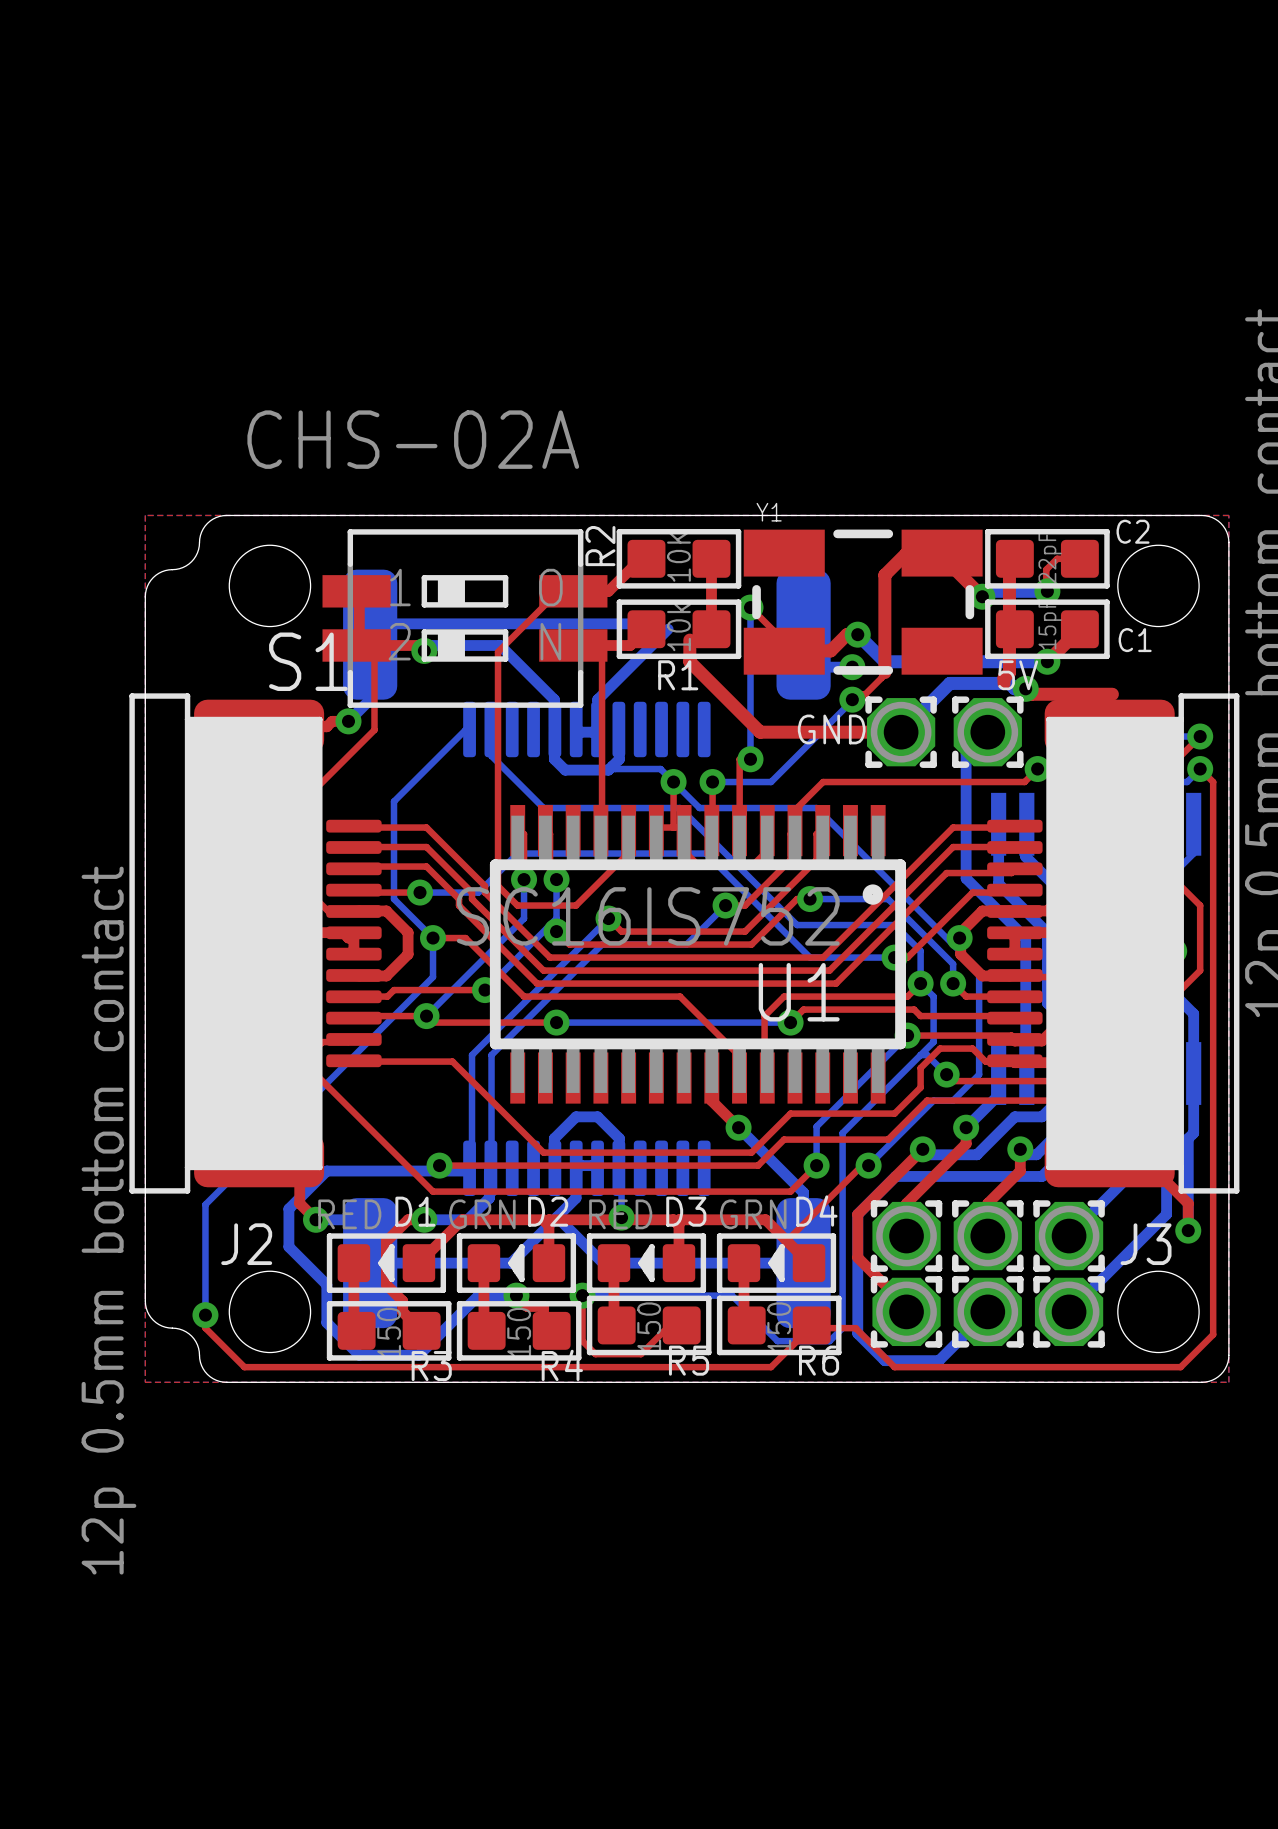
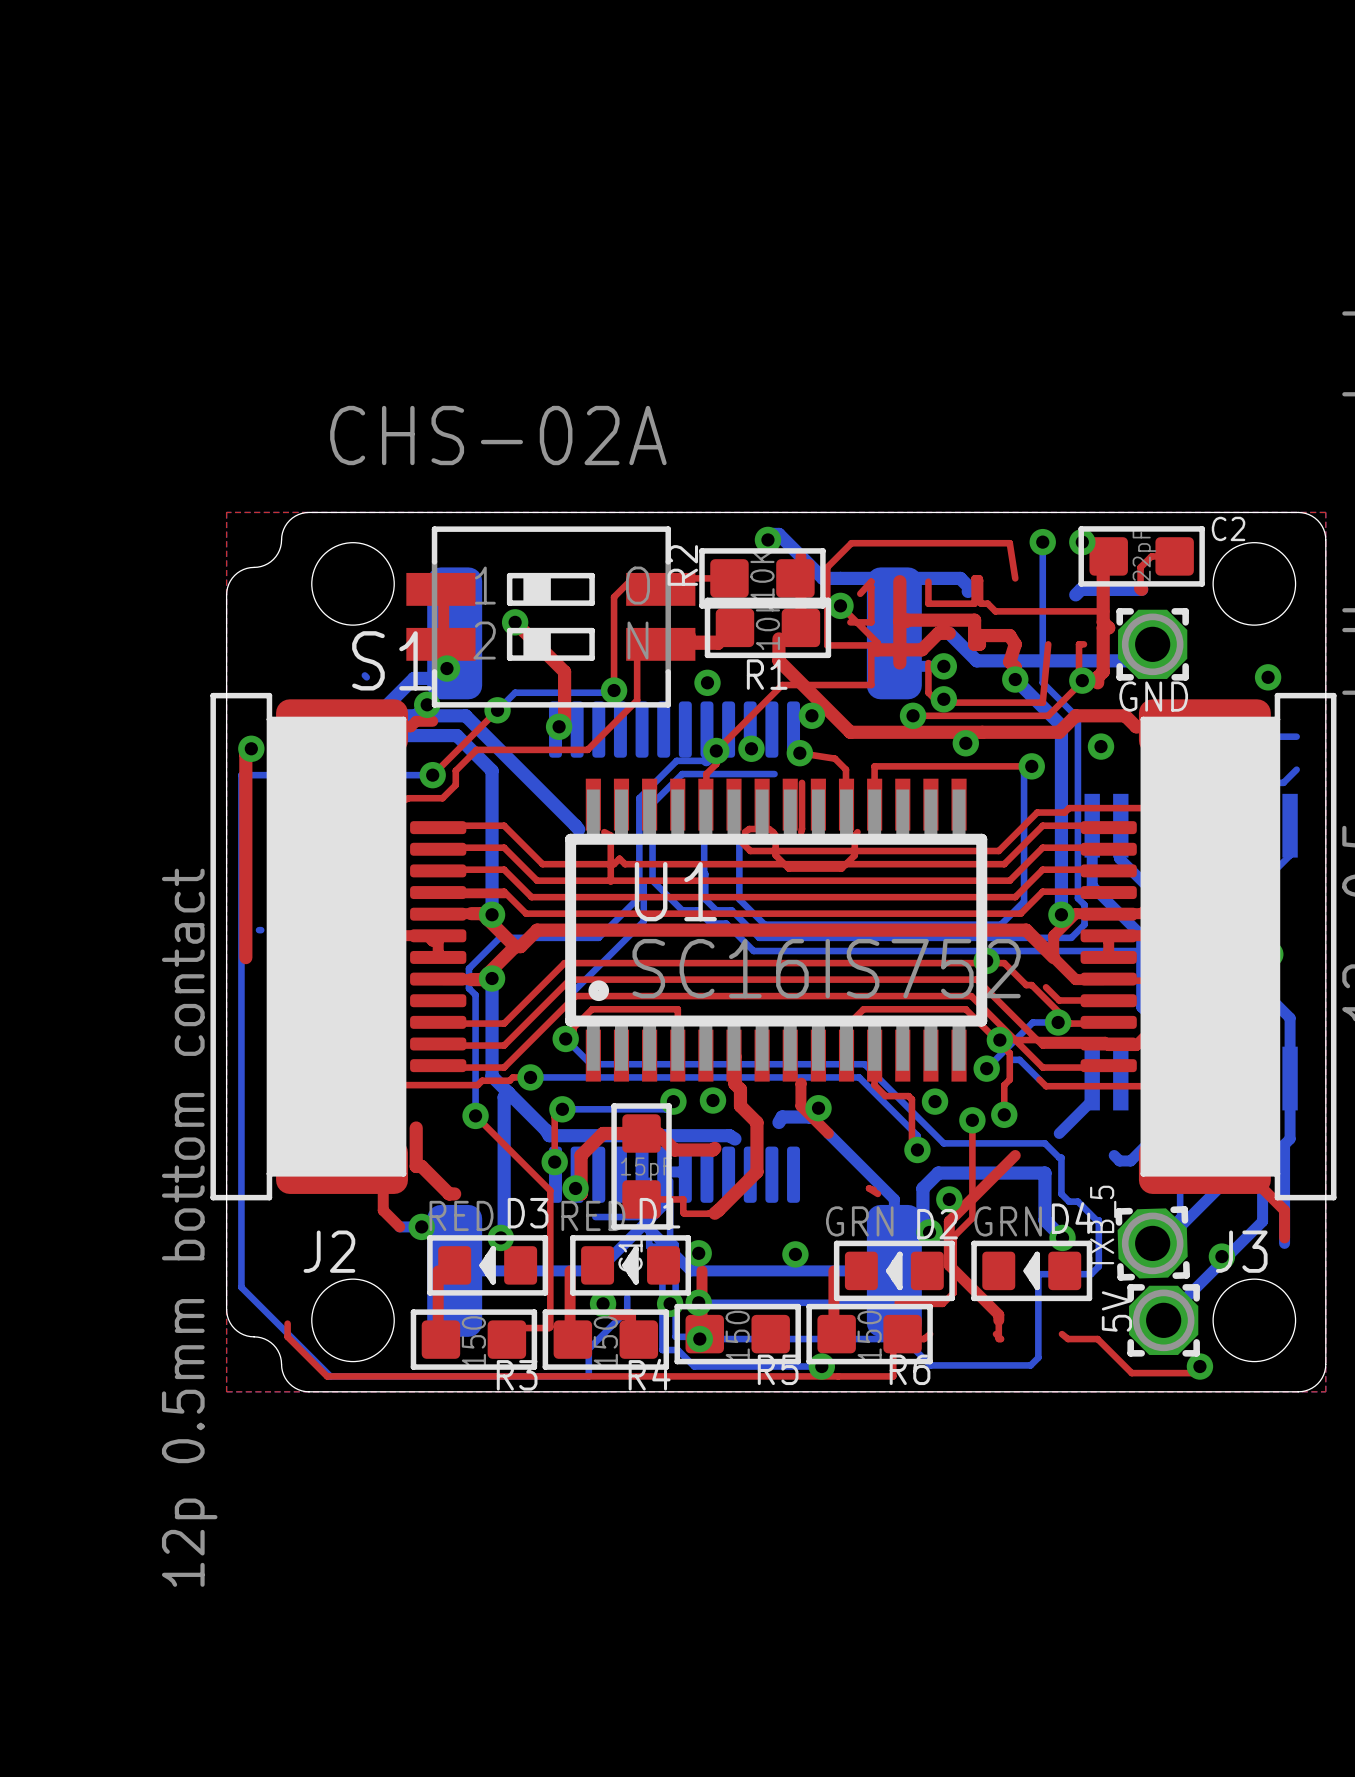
bottom track: none -> (767, 539) (773, 534) (778, 534) (822, 578) (960, 578) (971, 589) (968, 591)
via: none -> (767, 539)
bottom track: none -> (1042, 542) (1042, 682) (1077, 718) (1077, 898) (1084, 904) (1084, 924) (1071, 937) (759, 937) (731, 910) (716, 910) (705, 899) (704, 842)
via: none -> (1042, 542)
via: none -> (1082, 542)
top track: (646, 558) (641, 558) (608, 591) (556, 593) (498, 652) (498, 886) (517, 905) (576, 905) (628, 853) (628, 830) -> none
R2 position: (678, 558) -> (762, 578)
top track: none -> (729, 578) (632, 578) (614, 597) (614, 690)
top track: none -> (1015, 578) (1009, 543) (851, 543) (827, 567) (827, 645) (871, 645) (871, 685) (782, 685) (716, 750) (716, 764) (706, 774) (705, 804)
top track: none -> (899, 581) (899, 663)
top track: none -> (928, 581) (928, 603) (974, 603) (974, 578) (979, 578) (980, 602) (987, 603) (995, 611) (1106, 611)
via: (1047, 591) -> none
top track: none -> (860, 593) (871, 581) (871, 622) (850, 622)
top track: (982, 596) (944, 558) (942, 553) (906, 553) (884, 575) (884, 672) (865, 694) (861, 694) (852, 699) (857, 699) -> none
via: (982, 596) -> none
Y1: (863, 602) -> none
bottom track: (750, 607) (750, 759) -> none
top track: none -> (899, 621) (974, 620) (974, 630) (979, 644) (974, 644) (974, 635) (1009, 635) (1015, 644) (1009, 661) (1015, 667) (1015, 679)
top track: none -> (515, 622) (564, 671) (564, 726) (559, 726)
bottom track: (668, 629) (597, 699) (597, 729) (592, 732) (581, 732) (576, 729) -> none
C1 rotation: 0° (1047, 629) -> 90° clockwise (641, 1166)
C1 position: (1047, 629) -> (641, 1166)
via: (857, 634) -> none
top track: none -> (729, 638) (692, 638) (691, 633) (637, 633) (637, 700) (587, 749) (476, 749) (455, 770) (455, 785) (442, 798) (408, 798) (352, 826) (352, 1067) (397, 1085) (477, 1085) (482, 1080) (509, 1080) (512, 1077) (530, 1077)
bottom track: (654, 642) (635, 623) (375, 623) (370, 629) (370, 699) (348, 721) -> none
top track: (602, 645) (600, 830) -> none
top track: none -> (1048, 644) (1042, 702) (938, 702) (928, 692) (928, 663)
top track: none -> (1083, 644) (1079, 644) (1079, 677) (1082, 680) (1081, 682) (1048, 715) (913, 715)
top track: (424, 650) (418, 645) (356, 645) (374, 645) (374, 730) (315, 788) (315, 899) (328, 912) (353, 911) -> none
bottom track: (424, 650) (429, 645) (500, 645) (554, 699) (554, 759) (565, 770) (608, 770) (618, 760) -> none
via position: (424, 650) -> (515, 622)
via: (1047, 661) -> none
bottom track: none -> (446, 668) (437, 678) (414, 678) (385, 707) (385, 735) (456, 735) (492, 770) (492, 914)
via: none -> (446, 668)
bottom track: none -> (364, 675) (366, 677)
via: none -> (1268, 677)
bottom track: none -> (1015, 679) (1061, 725) (1061, 914)
via: none -> (1015, 679)
via: none -> (1082, 680)
via: none -> (707, 682)
top track: (1025, 688) (1031, 694) (1112, 694) -> none
bottom track: (1025, 688) (1014, 688) (1009, 683) (949, 683) (901, 732) -> none
via: (1025, 688) -> none
bottom track: none -> (614, 690) (614, 692) (515, 692) (497, 710)
via: none -> (614, 690)
bottom track: (857, 699) (852, 699) (771, 782) (712, 782) -> none
top track: none -> (497, 710) (432, 775)
via: none -> (497, 710)
bottom track: none -> (405, 715) (465, 715) (578, 829)
via: none -> (811, 715)
via: none -> (913, 715)
via position: (348, 721) -> (427, 704)
via: none -> (559, 726)
top track: none -> (1204, 726) (1136, 726) (1125, 715) (1075, 715) (1059, 732) (993, 732)
bottom track: (469, 729) (465, 730) (394, 801) (394, 899) (433, 938) (433, 977) (205, 1204) (205, 1315) -> none
GND name position: GND (831, 729) -> GND (1153, 696)
bottom track: (491, 730) (491, 756) (543, 808) (680, 808) (797, 925) (894, 925) (920, 951) (920, 983) (933, 996) (933, 1042) (842, 1133) (842, 1328) (829, 1341) (777, 1341) (732, 1295) (582, 1295) -> none
GND position: (901, 732) -> (1152, 644)
bottom track: (987, 732) (966, 753) (966, 878) (1025, 938) (1026, 1073) -> none
5V: (987, 732) -> none
top track: (1200, 736) (1174, 762) (1174, 879) (1200, 905) (1200, 970) (1070, 1100) (927, 1100) (888, 1139) (784, 1139) (758, 1165) (439, 1165) -> none
via: (1200, 736) -> none
via: none -> (965, 743)
via: none -> (1101, 746)
top track: none -> (251, 748) (245, 754) (245, 957)
via: none -> (251, 748)
via: none -> (751, 748)
bottom track: none -> (716, 750) (706, 760) (676, 760) (639, 798) (639, 897) (598, 937) (499, 937) (468, 968) (468, 988) (475, 995) (475, 1115)
via: none -> (716, 750)
top track: none -> (799, 753) (835, 758) (845, 769) (846, 804)
via: none -> (799, 753)
top track: (750, 759) (739, 759) (739, 830) -> none
via: (750, 759) -> none
top track: none -> (1031, 766) (874, 766) (874, 804)
bottom track: none -> (1031, 766) (1024, 774) (1024, 901) (1000, 924) (764, 924) (739, 899) (739, 842)
via: none -> (1031, 766)
bottom track: (612, 766) (615, 769) (660, 769) (699, 808) (816, 808) (979, 970) (979, 1074) (953, 1100) (933, 1100) (868, 1165) -> none
top track: (1037, 769) (1024, 782) (823, 782) (797, 808) (797, 827) (790, 834) (790, 860) (745, 905) (725, 905) -> none
via: (1037, 769) -> none
top track: (1200, 769) (1213, 782) (1213, 1334) (1180, 1367) (894, 1367) (855, 1328) (816, 1328) (811, 1325) (771, 1367) -> (930, 1334) (924, 1339) (893, 1340) (893, 1376) (861, 1376)
via: (1200, 769) -> none
bottom track: none -> (774, 774) (682, 774) (652, 803) (652, 880) (682, 910) (697, 910) (710, 923) (726, 923) (753, 951) (1149, 951) (1180, 981) (1180, 1215) (1152, 1243)
bottom track: none -> (432, 775) (241, 775) (241, 1287) (330, 1376) (588, 1376) (588, 1348) (627, 1310) (627, 1297)
via: none -> (432, 775)
top track: (673, 782) (673, 827) -> none
via: (673, 782) -> none
via: (712, 782) -> none
top track: none -> (733, 804) (733, 834) (750, 851) (998, 851) (1037, 812) (1064, 812) (1069, 808) (1149, 807)
top track: (353, 826) (426, 827) (485, 886) (485, 892) (550, 957) (823, 957) (953, 827) (1014, 826) -> (438, 827) (443, 825) (504, 825) (542, 864) (614, 864) (619, 858) (625, 864) (1004, 864) (1042, 825) (1103, 825) (1108, 827)
top track: (822, 830) (816, 834) (816, 860) (745, 931) (621, 931) (608, 918) -> none
top track: (353, 847) (426, 847) (472, 892) (472, 899) (543, 970) (829, 970) (953, 847) (1014, 847) -> (438, 849) (504, 847) (537, 880) (1009, 880) (1042, 847) (1108, 849)
top track: (353, 868) (354, 866) (426, 866) (459, 899) (459, 905) (537, 983) (836, 983) (946, 873) (1011, 873) (1014, 868) -> (438, 870) (504, 869) (531, 897) (1015, 897) (1042, 869) (1108, 870)
bottom track: (524, 879) (524, 918) (426, 1016) -> none
via: (524, 879) -> none
via: (556, 879) -> none
top track: (1014, 890) (1011, 892) (972, 892) (907, 957) (894, 957) -> (1108, 892) (1042, 891) (1020, 913) (526, 913) (504, 891) (438, 892)
bottom track: (420, 892) (478, 892) (517, 853) (706, 853) (810, 957) (894, 957) -> none
via: (420, 892) -> none
top track: (810, 899) (797, 899) (751, 944) (569, 944) (556, 931) -> none
bottom track: (810, 899) (888, 899) (953, 964) (953, 983) -> none
via: (810, 899) -> none
bottom track: (725, 905) (686, 944) (602, 944) (491, 1055) (491, 1165) (489, 1171) (489, 1198) (467, 1219) (424, 1219) -> none
via: (725, 905) -> none
top track: (386, 910) (408, 932) (408, 954) (386, 975) -> (515, 946) (482, 979) (471, 979)
top track: none -> (471, 913) (482, 913) (515, 946)
via: none -> (492, 914)
bottom track: (608, 918) (472, 1055) (472, 1165) (467, 1171) (326, 1171) (288, 1208) (288, 1246) (326, 1284) (326, 1322) (359, 1355) (418, 1355) (478, 1295) (516, 1295) -> none
via: (608, 918) -> none
bottom track: none -> (259, 930) (261, 930)
via: (556, 931) -> none
top track: (433, 938) (465, 938) (524, 996) (680, 996) (738, 1055) (739, 1078) -> none
via: (433, 938) -> none
via position: (959, 938) -> (1061, 914)
top track: none -> (515, 946) (520, 946) (537, 930) (1026, 930) (1053, 957)
U1 rotation: 0° (697, 954) -> 180° (776, 930)
bottom track: none -> (492, 978) (492, 1076) (549, 1135) (729, 1135) (734, 1138)
via: none -> (492, 978)
top track: (920, 983) (907, 996) (784, 996) (764, 1016) (764, 1074) (767, 1078) -> none
via: (920, 983) -> none
via: (953, 983) -> none
top track: (485, 990) (394, 990) (387, 996) (353, 996) -> none
via: (485, 990) -> none
top track: (1096, 1013) (1096, 1030) (1063, 1062) (985, 1061) (972, 1048) (940, 1048) (920, 1068) (920, 1087) (894, 1113) (790, 1113) (751, 1152) (543, 1152) (452, 1061) (353, 1060) -> (1108, 1065) (1103, 1067) (1042, 1067) (971, 996) (575, 996) (504, 1067) (443, 1067) (438, 1065)
via: (426, 1016) -> none
top track: (353, 1018) (354, 1016) (426, 1016) (433, 1022) (556, 1022) -> none
bottom track: none -> (1058, 1022) (1032, 1022) (986, 1068)
via: none -> (1058, 1022)
top track: (1014, 1018) (1011, 1016) (920, 1016) (914, 1009) (803, 1009) (790, 1022) -> (1108, 1022) (1070, 1023) (1031, 985) (1026, 985) (1004, 963) (564, 963) (504, 1023) (438, 1022)
bottom track: (556, 1022) (790, 1022) -> none
via: (556, 1022) -> none
via: (790, 1022) -> none
top track: none -> (565, 1038) (573, 1031) (573, 1027) (592, 1009) (677, 1009) (677, 1055)
bottom track: none -> (565, 1038) (590, 1064) (864, 1064) (943, 1143) (1044, 1143) (1061, 1157) (1061, 1193) (1069, 1201) (1077, 1201) (1098, 1220) (1098, 1266) (1091, 1274) (1038, 1274) (1038, 1357) (1030, 1365) (930, 1365) (904, 1339) (699, 1339) (697, 1336) (675, 1336) (675, 1244) (670, 1239) (670, 1180)
via: none -> (565, 1038)
bottom track: (907, 1035) (816, 1126) (816, 1165) -> none
top track: (353, 1039) (348, 1042) (322, 1042) (315, 1048) (315, 1074) (433, 1191) (790, 1191) (816, 1165) -> (438, 1044) (504, 1045) (570, 979) (976, 979) (1042, 1045) (1108, 1044)
top track: none -> (734, 1055) (734, 1084) (740, 1089) (740, 1106) (756, 1122) (756, 1171) (714, 1213) (684, 1213) (683, 1199) (641, 1199)
top track: none -> (845, 1055) (845, 1026) (863, 1009) (965, 1009) (1009, 1053) (1009, 1079) (1004, 1085) (1004, 1114)
top track: none -> (874, 1055) (874, 1085) (885, 1096) (908, 1096) (911, 1099) (911, 1144) (917, 1149)
via: none -> (986, 1068)
bottom track: none -> (530, 1077) (859, 1077) (917, 1135) (917, 1149)
via: none -> (530, 1077)
bottom track: (1054, 1073) (1052, 1073) (1052, 1106) (1041, 1116) (1014, 1116) (976, 1154) (928, 1154) (922, 1149) -> none
bottom track: (1110, 1073) (1112, 1073) (1112, 1106) (1041, 1176) (895, 1176) (857, 1214) (857, 1333) (884, 1360) (939, 1360) (987, 1311) -> none
via: (946, 1074) -> none
bottom track: none -> (508, 1092) (504, 1097) (504, 1234) (500, 1237)
via: none -> (712, 1100)
bottom track: none -> (673, 1101) (665, 1109) (562, 1109)
via: none -> (673, 1101)
via: none -> (935, 1101)
bottom track: none -> (818, 1108) (809, 1117) (782, 1117) (778, 1122)
top track: none -> (562, 1109) (554, 1117) (554, 1162)
via: none -> (562, 1109)
via: none -> (1004, 1114)
top track: none -> (475, 1115) (550, 1190) (550, 1326) (523, 1328)
via: none -> (475, 1115)
top track: none -> (972, 1120) (972, 1218) (953, 1236) (953, 1292) (942, 1303) (897, 1302)
via: none -> (972, 1120)
top track: none -> (416, 1128) (416, 1166) (421, 1166) (449, 1193) (454, 1193)
via position: (738, 1127) -> (818, 1108)
top track: (966, 1127) (966, 1143) (906, 1203) (906, 1236) -> none
via: (966, 1127) -> none
top track: none -> (714, 1148) (712, 1149) (674, 1149) (658, 1133) (603, 1133) (581, 1155) (581, 1193) (575, 1188) (572, 1189)
via: (922, 1149) -> none
top track: (1020, 1149) (1020, 1171) (987, 1203) (987, 1236) -> none
via: (1020, 1149) -> none
via: none -> (554, 1162)
via: (439, 1165) -> none
via position: (816, 1165) -> (917, 1149)
top track: (868, 1165) (862, 1165) (786, 1240) -> none
via: (868, 1165) -> none
bottom track: (554, 1168) (554, 1138) (576, 1116) (597, 1116) (619, 1138) (621, 1217) -> none
bottom track: none -> (649, 1180) (649, 1246) (659, 1246) (662, 1250) (662, 1350) (677, 1350) (694, 1366) (821, 1366)
via: none -> (575, 1188)
top track: none -> (873, 1189) (869, 1188) (877, 1193)
via: none -> (949, 1199)
bottom track: none -> (595, 1217) (649, 1217)
D2 name position: D2 (548, 1211) -> D2 (937, 1224)
via position: (621, 1217) -> (698, 1253)
via position: (315, 1219) -> (421, 1226)
top track: (424, 1219) (408, 1219) (386, 1241) (386, 1284) (402, 1301) (402, 1311) (421, 1330) -> none
via position: (424, 1219) -> (500, 1237)
top track: (546, 1222) (548, 1219) (673, 1219) (678, 1225) (678, 1263) -> none
top track: (676, 1222) (678, 1219) (765, 1219) (809, 1263) -> none
bottom track: none -> (929, 1232) (921, 1224) (922, 1188) (938, 1173) (1044, 1173) (1044, 1220) (1062, 1237)
via: none -> (929, 1232)
via: none -> (1062, 1237)
via position: (1188, 1230) -> (1221, 1256)
part: (906, 1236) -> none
part: (987, 1236) -> none
TXB_5: none -> (1152, 1243)
part: (1069, 1236) -> none
via: none -> (795, 1254)
D1 position: (386, 1263) -> (630, 1265)
top track: (418, 1263) (462, 1219) (543, 1219) (548, 1225) (548, 1263) -> none
D2 position: (516, 1263) -> (894, 1270)
D3 position: (646, 1263) -> (487, 1265)
D4 position: (776, 1263) -> (1031, 1270)
bottom track: none -> (698, 1302) (897, 1302)
via: none -> (698, 1302)
top track: (582, 1295) (582, 1341) (595, 1354) (641, 1354) (667, 1328) (680, 1328) (681, 1325) -> none
5V name: none -> 5V (1116, 1311)
top track: none -> (998, 1320) (998, 1339) (1000, 1339) (996, 1334)
part: (906, 1311) -> none
part: (987, 1311) -> none
via: (205, 1315) -> none
top track: none -> (1061, 1334) (1068, 1339) (1097, 1339) (1131, 1373) (1198, 1373) (1199, 1366)
via: none -> (699, 1339)
via: none -> (821, 1366)
via: none -> (1199, 1366)

